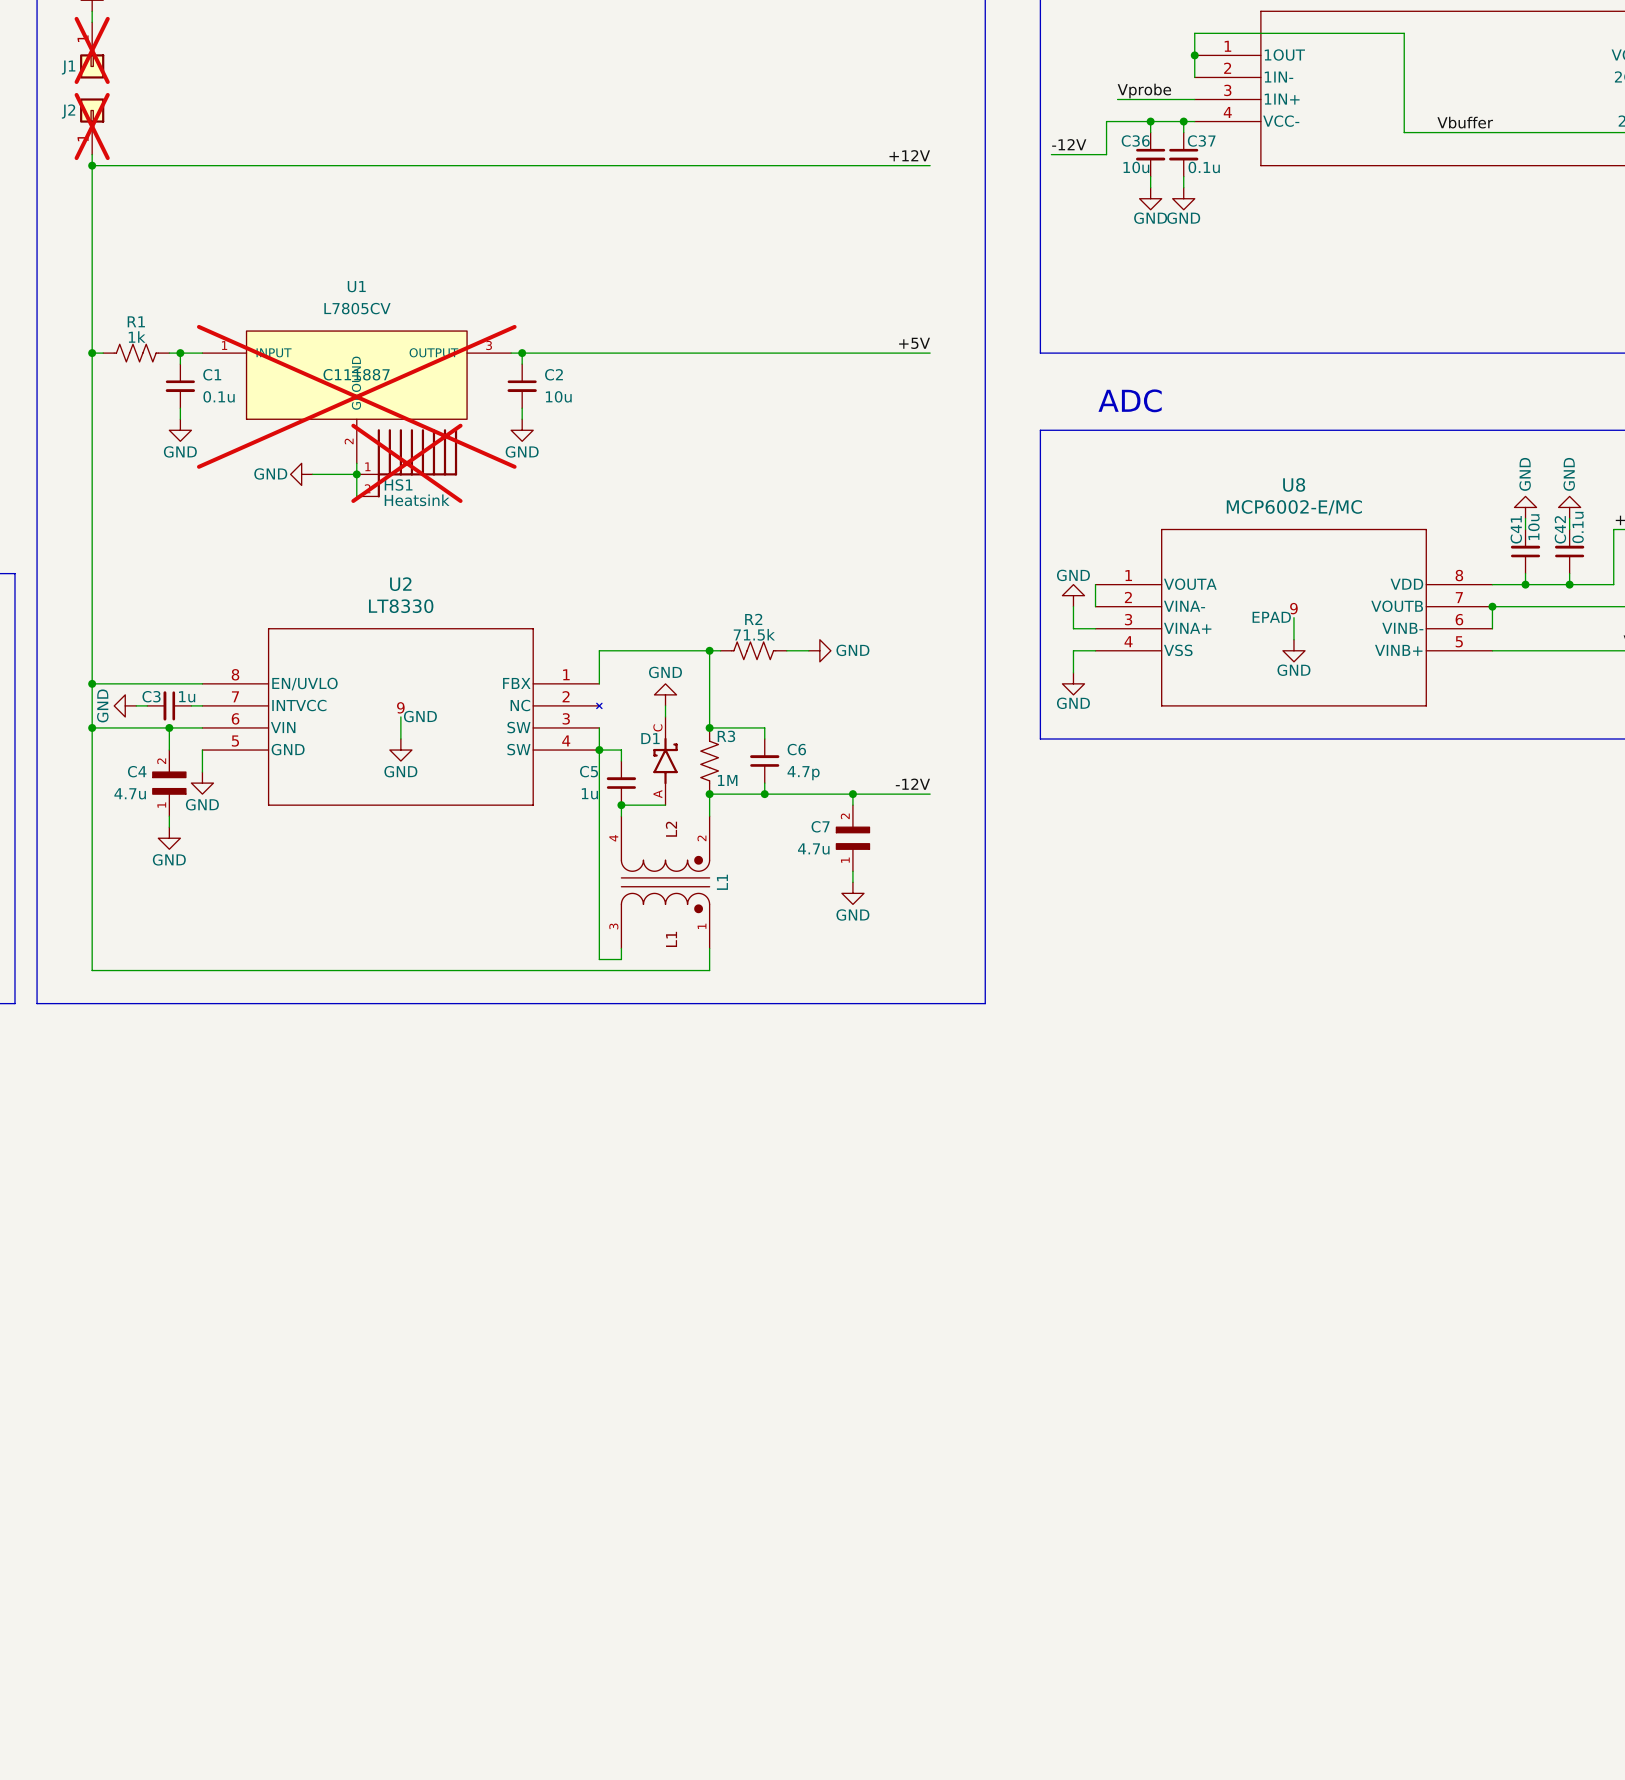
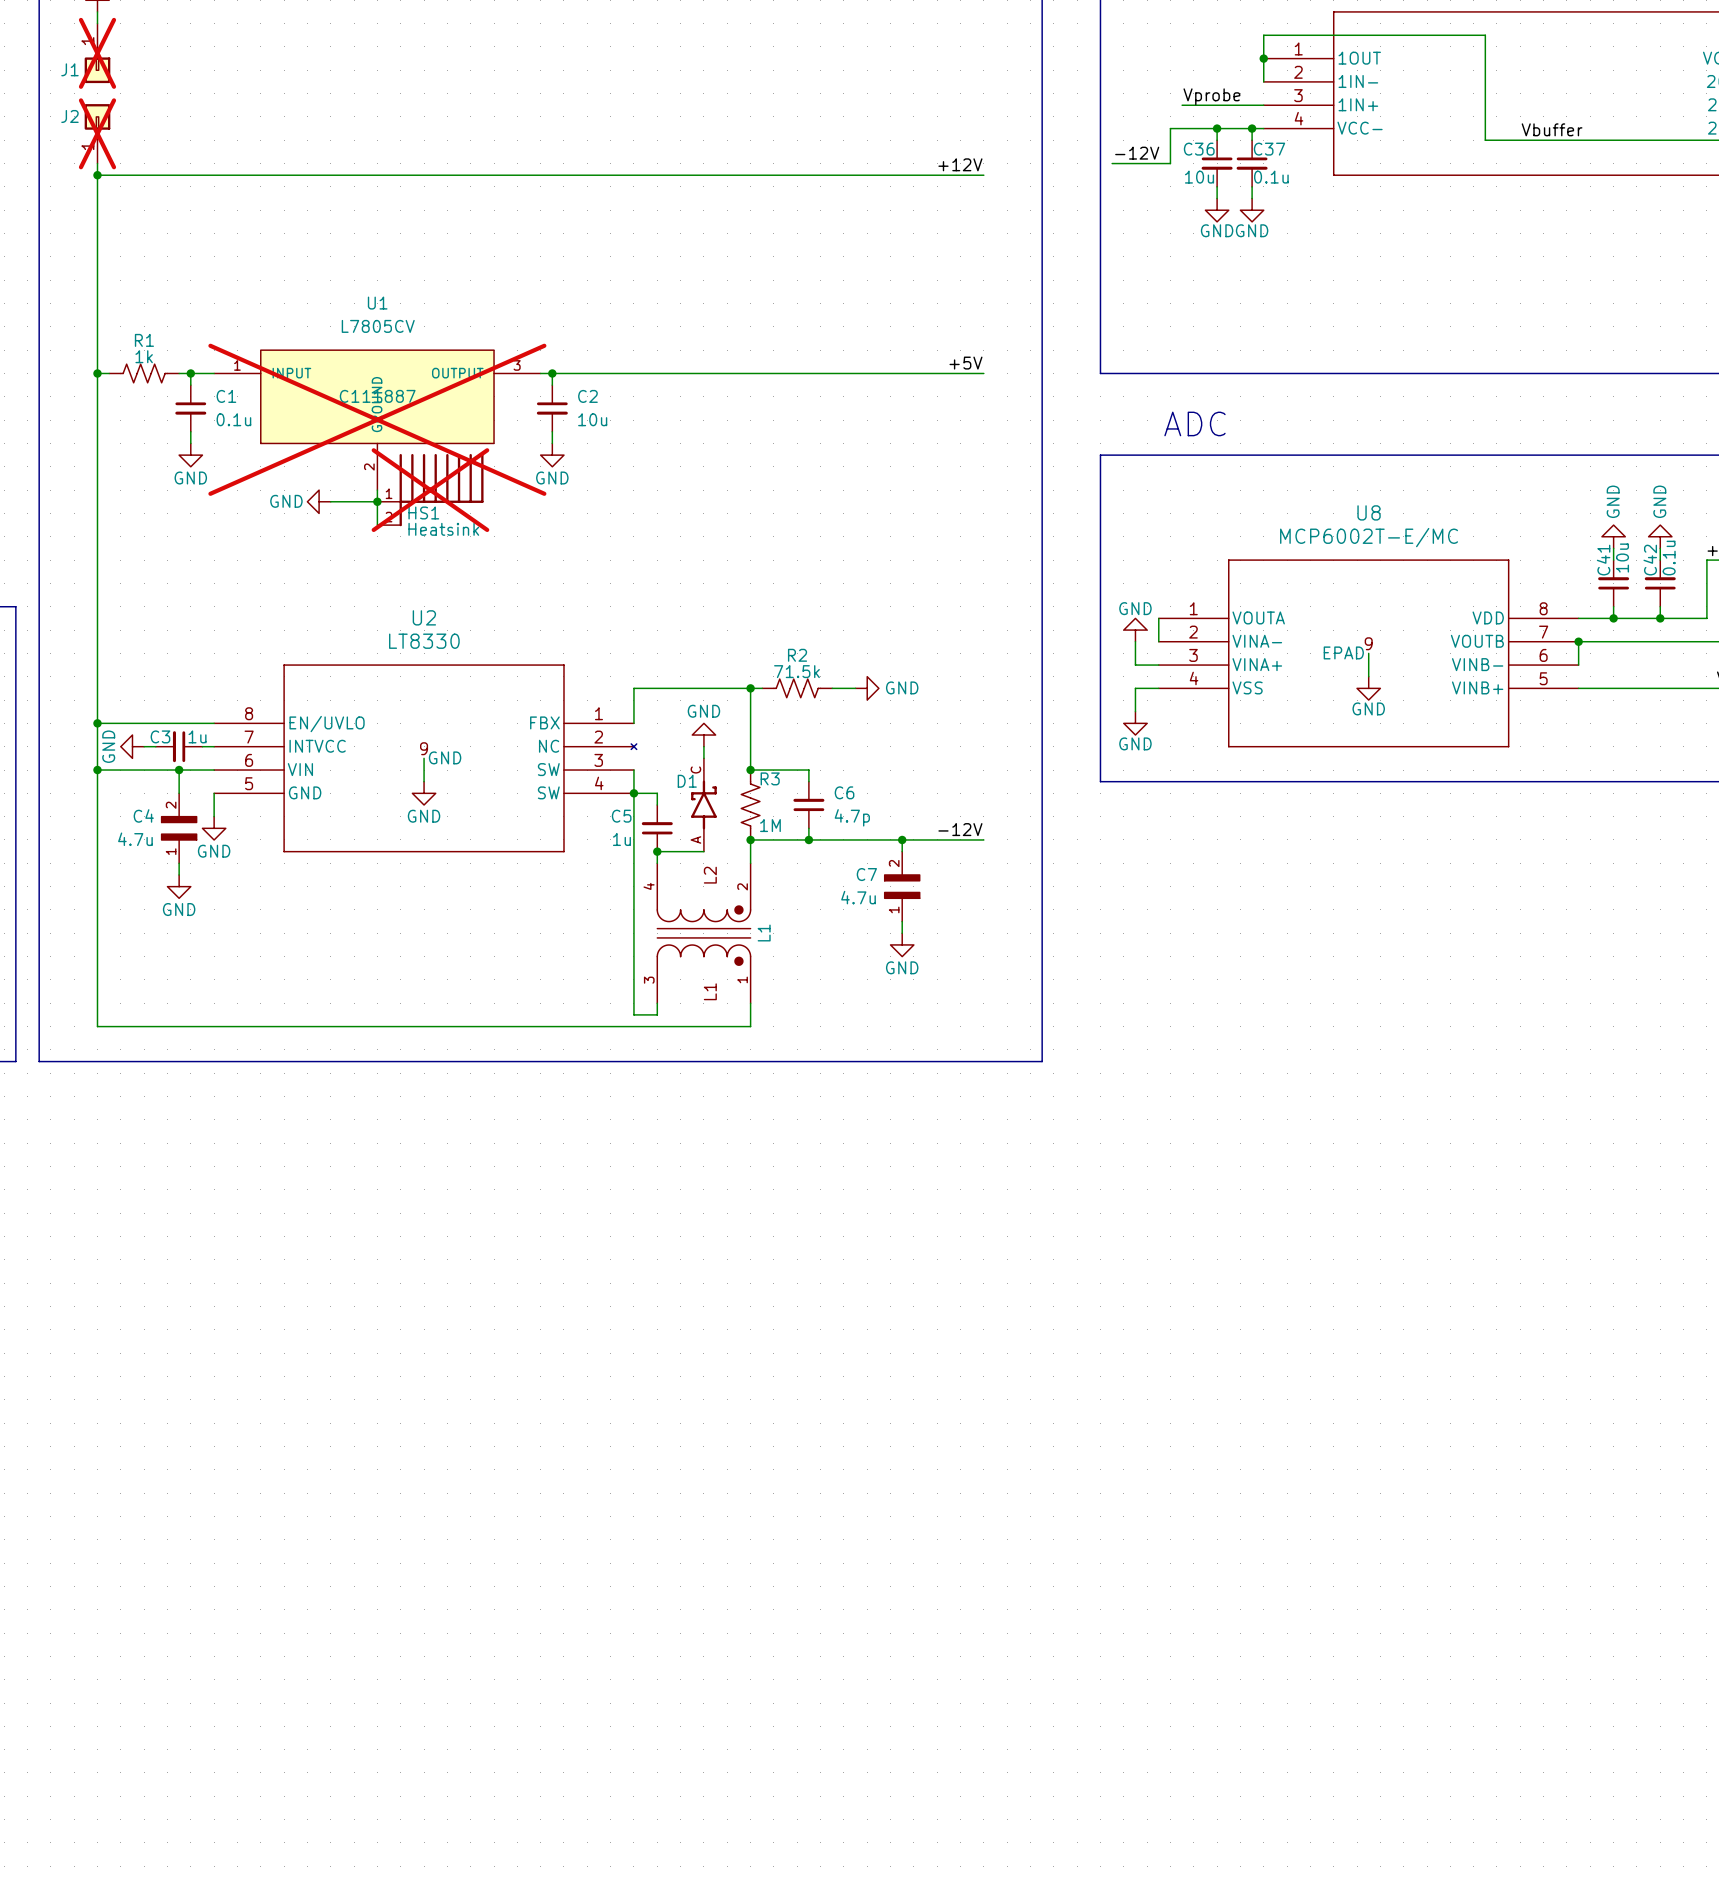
U8 value: MCP6002-E/MC (1294, 507) -> MCP6002T-E/MC (1369, 537)

